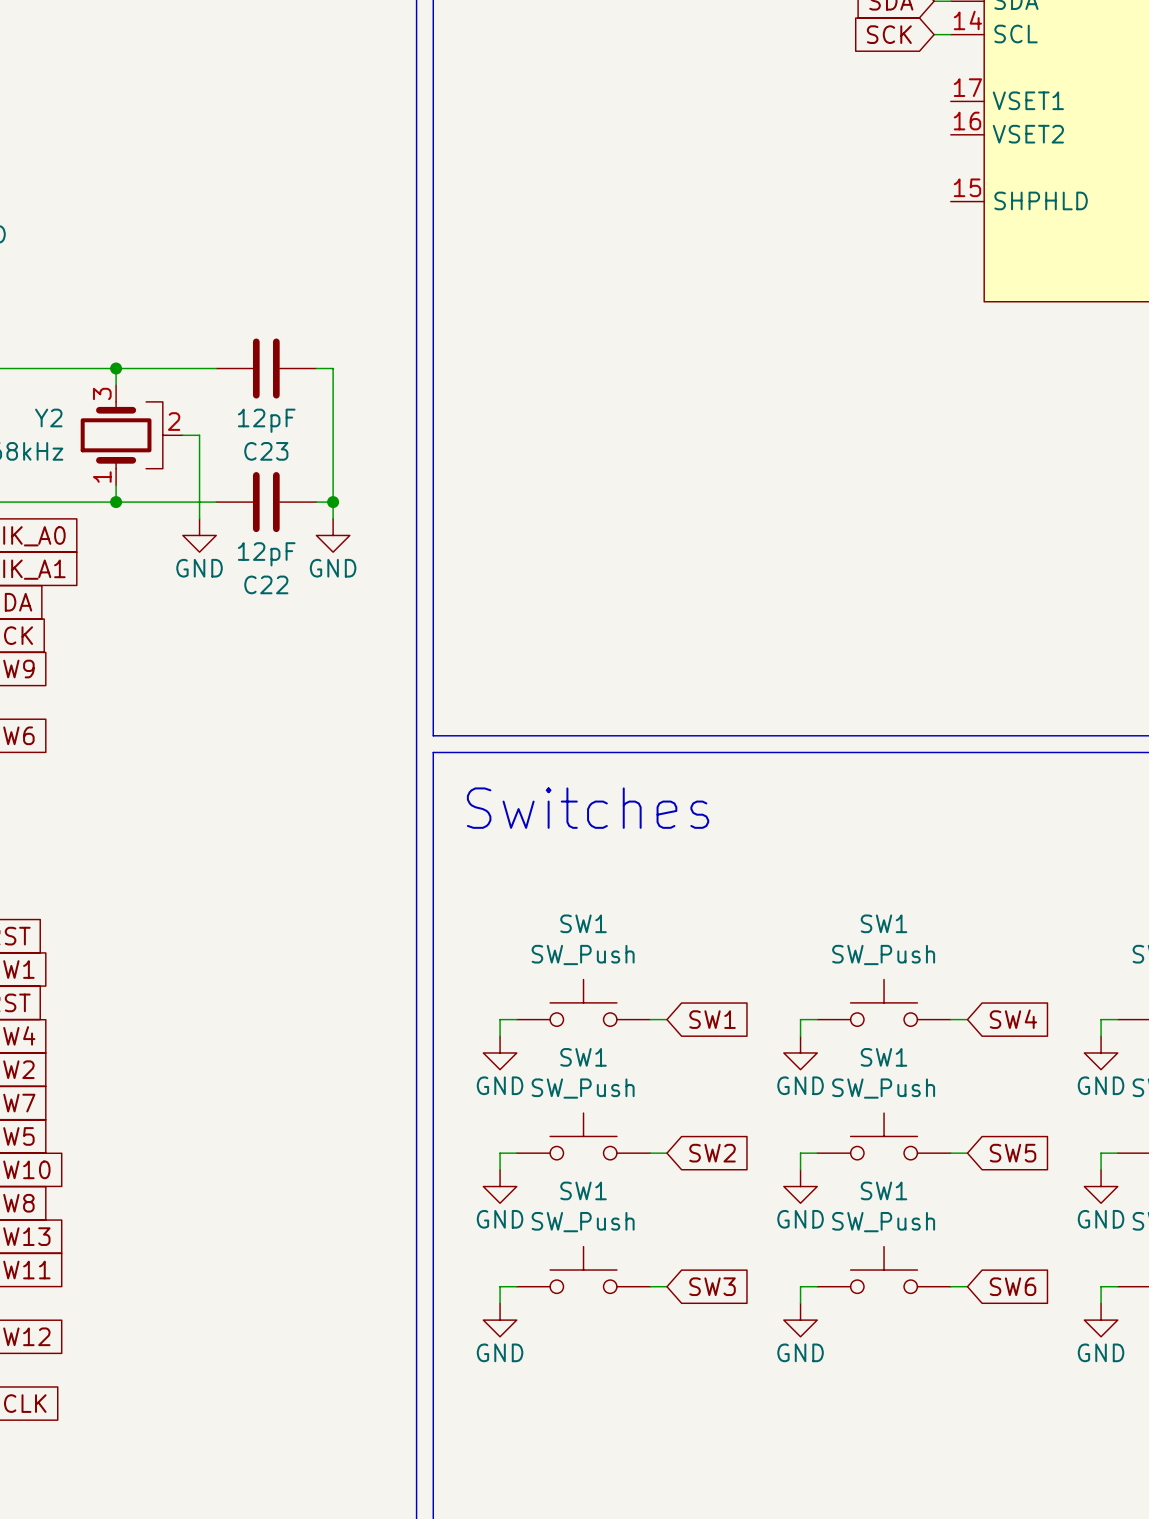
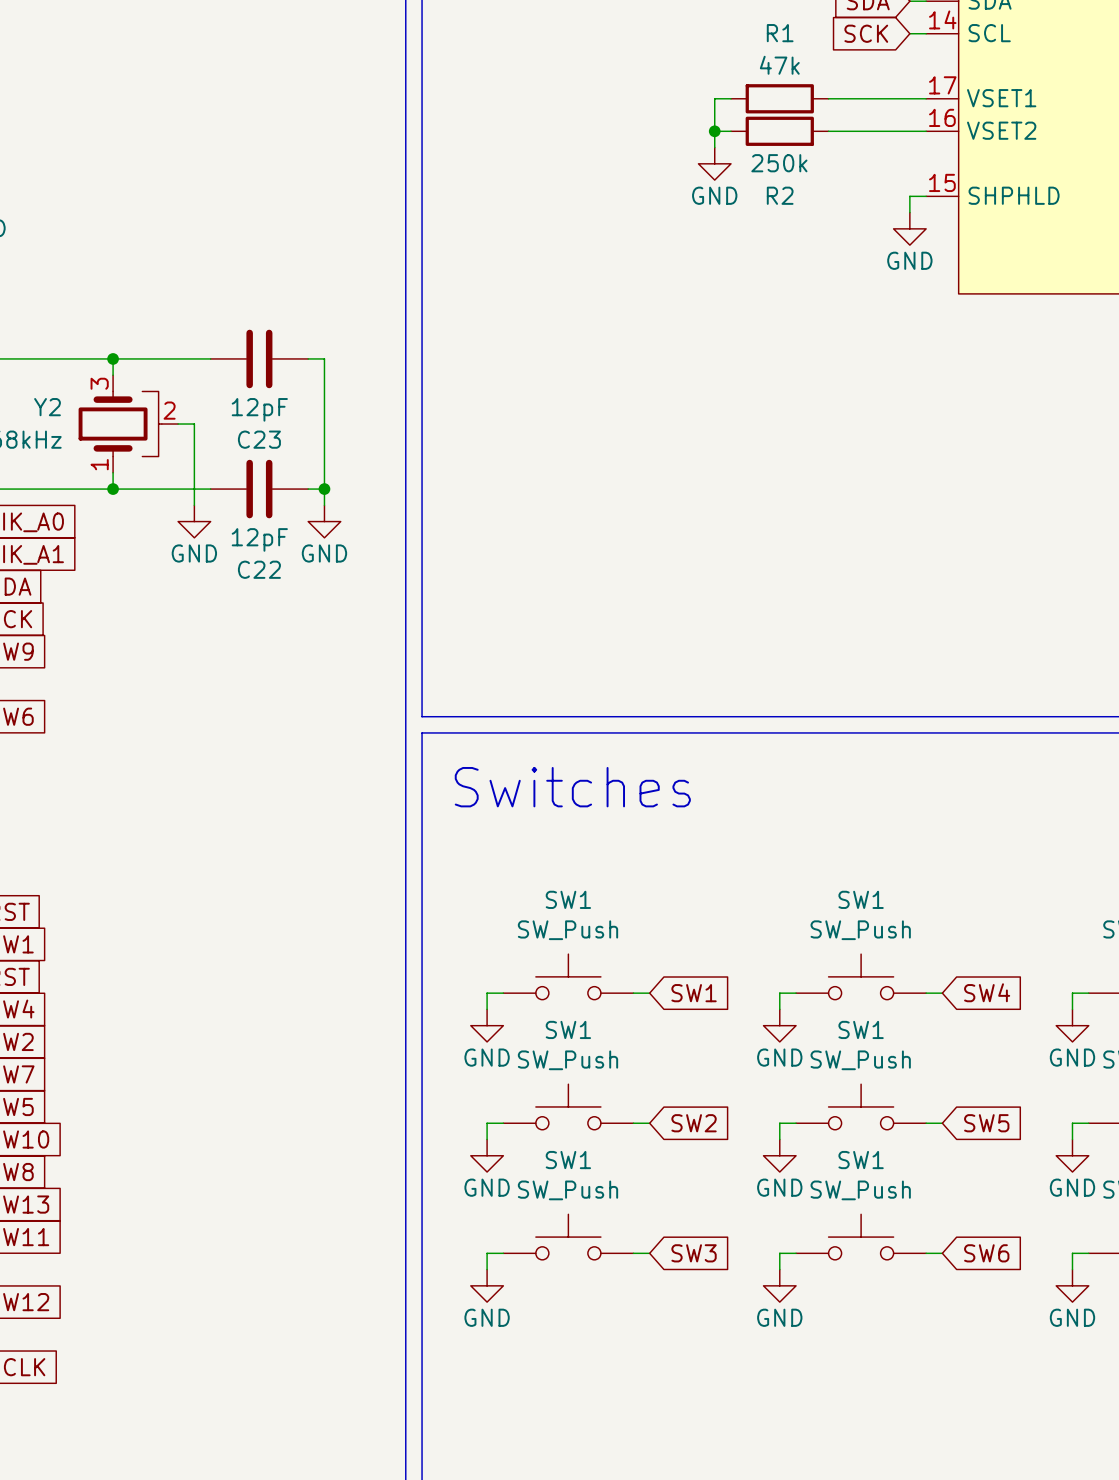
wire: none -> (730, 98) (714, 98) (714, 147)
R1: none -> 47k (779, 98)
wire: none -> (828, 98) (926, 98)
wire: none -> (714, 131) (730, 131)
junction: none -> (714, 131)
R2: none -> 250k (779, 131)
wire: none -> (828, 131) (926, 131)
power symbol: none -> GND (714, 163)
wire: none -> (926, 196) (909, 196) (909, 212)
power symbol: none -> GND (909, 228)

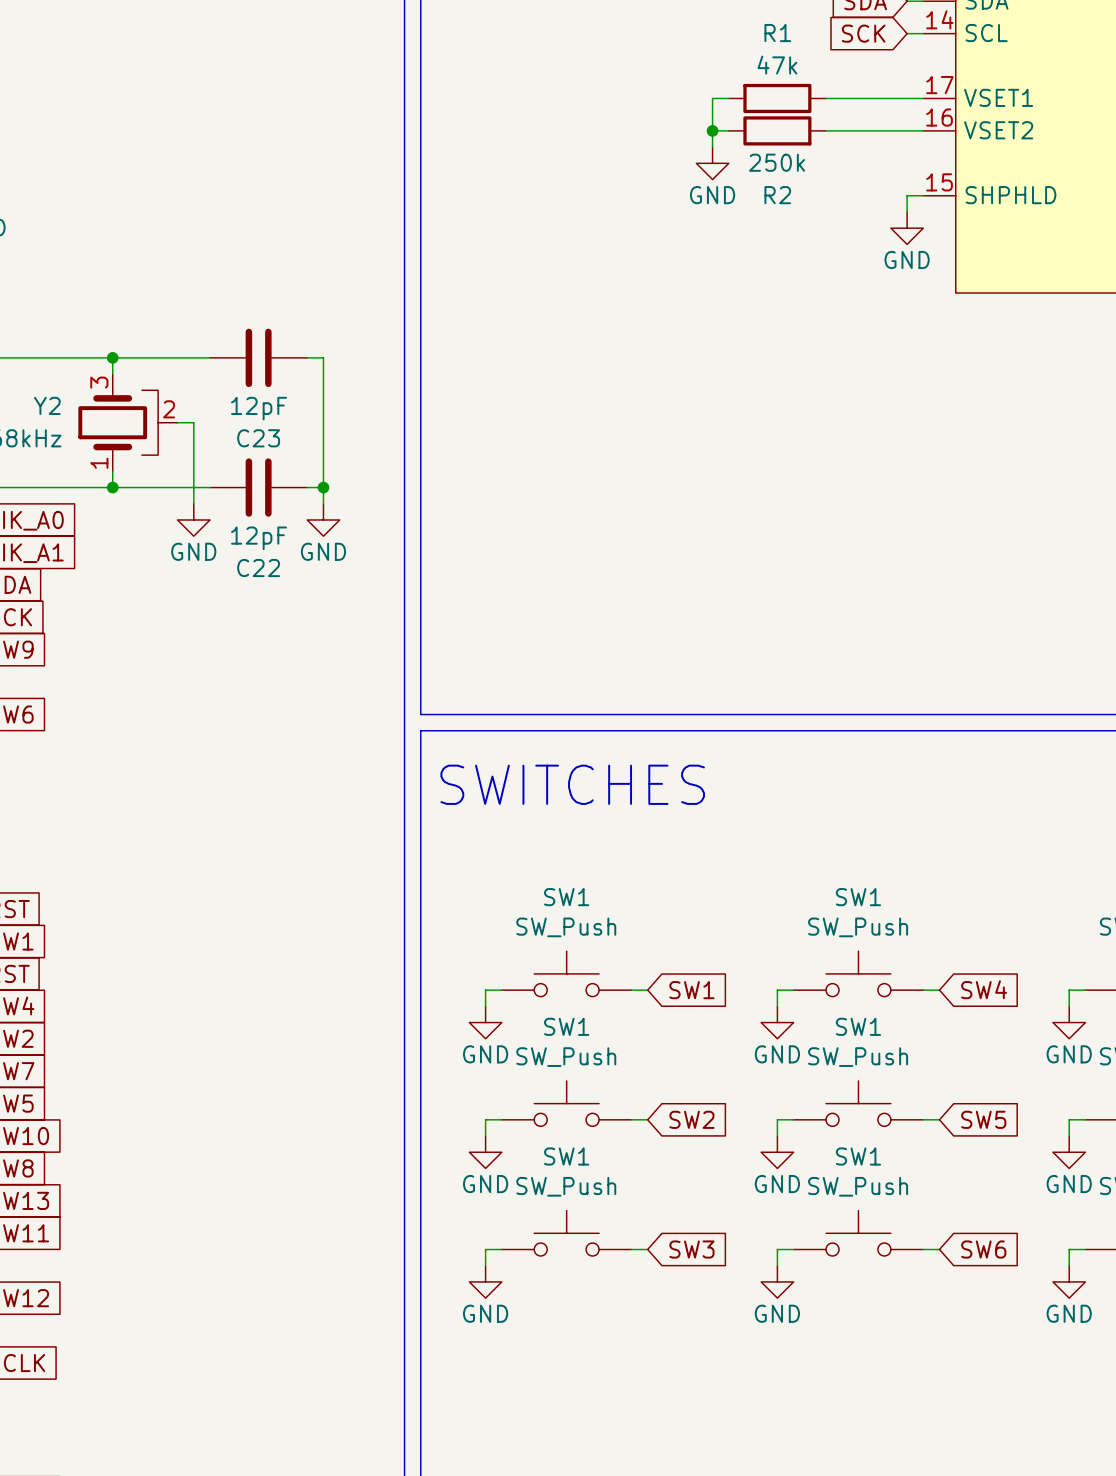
text: Switches (572, 787) -> none
text: none -> SWITCHES (572, 784)

